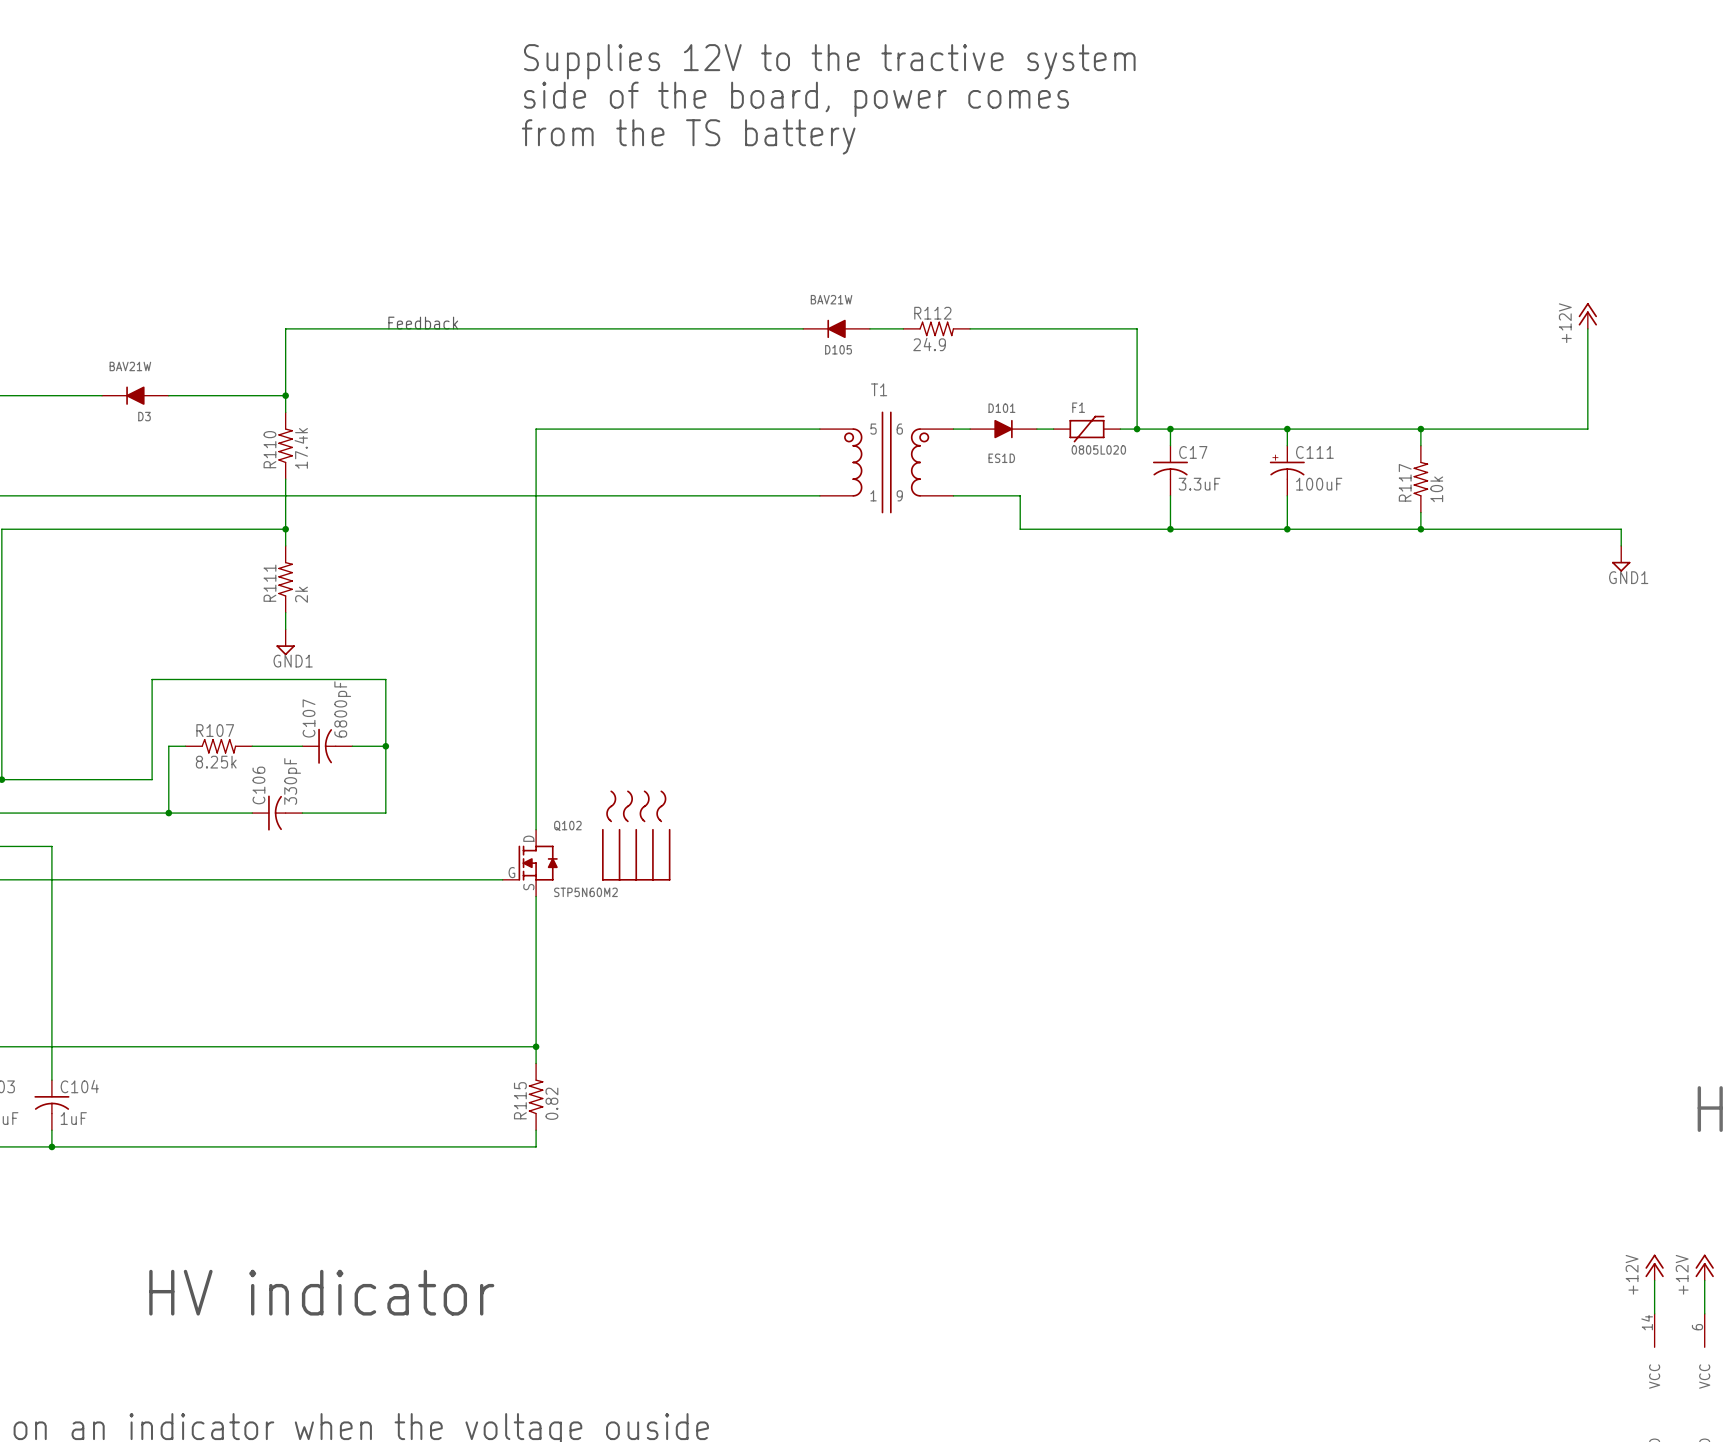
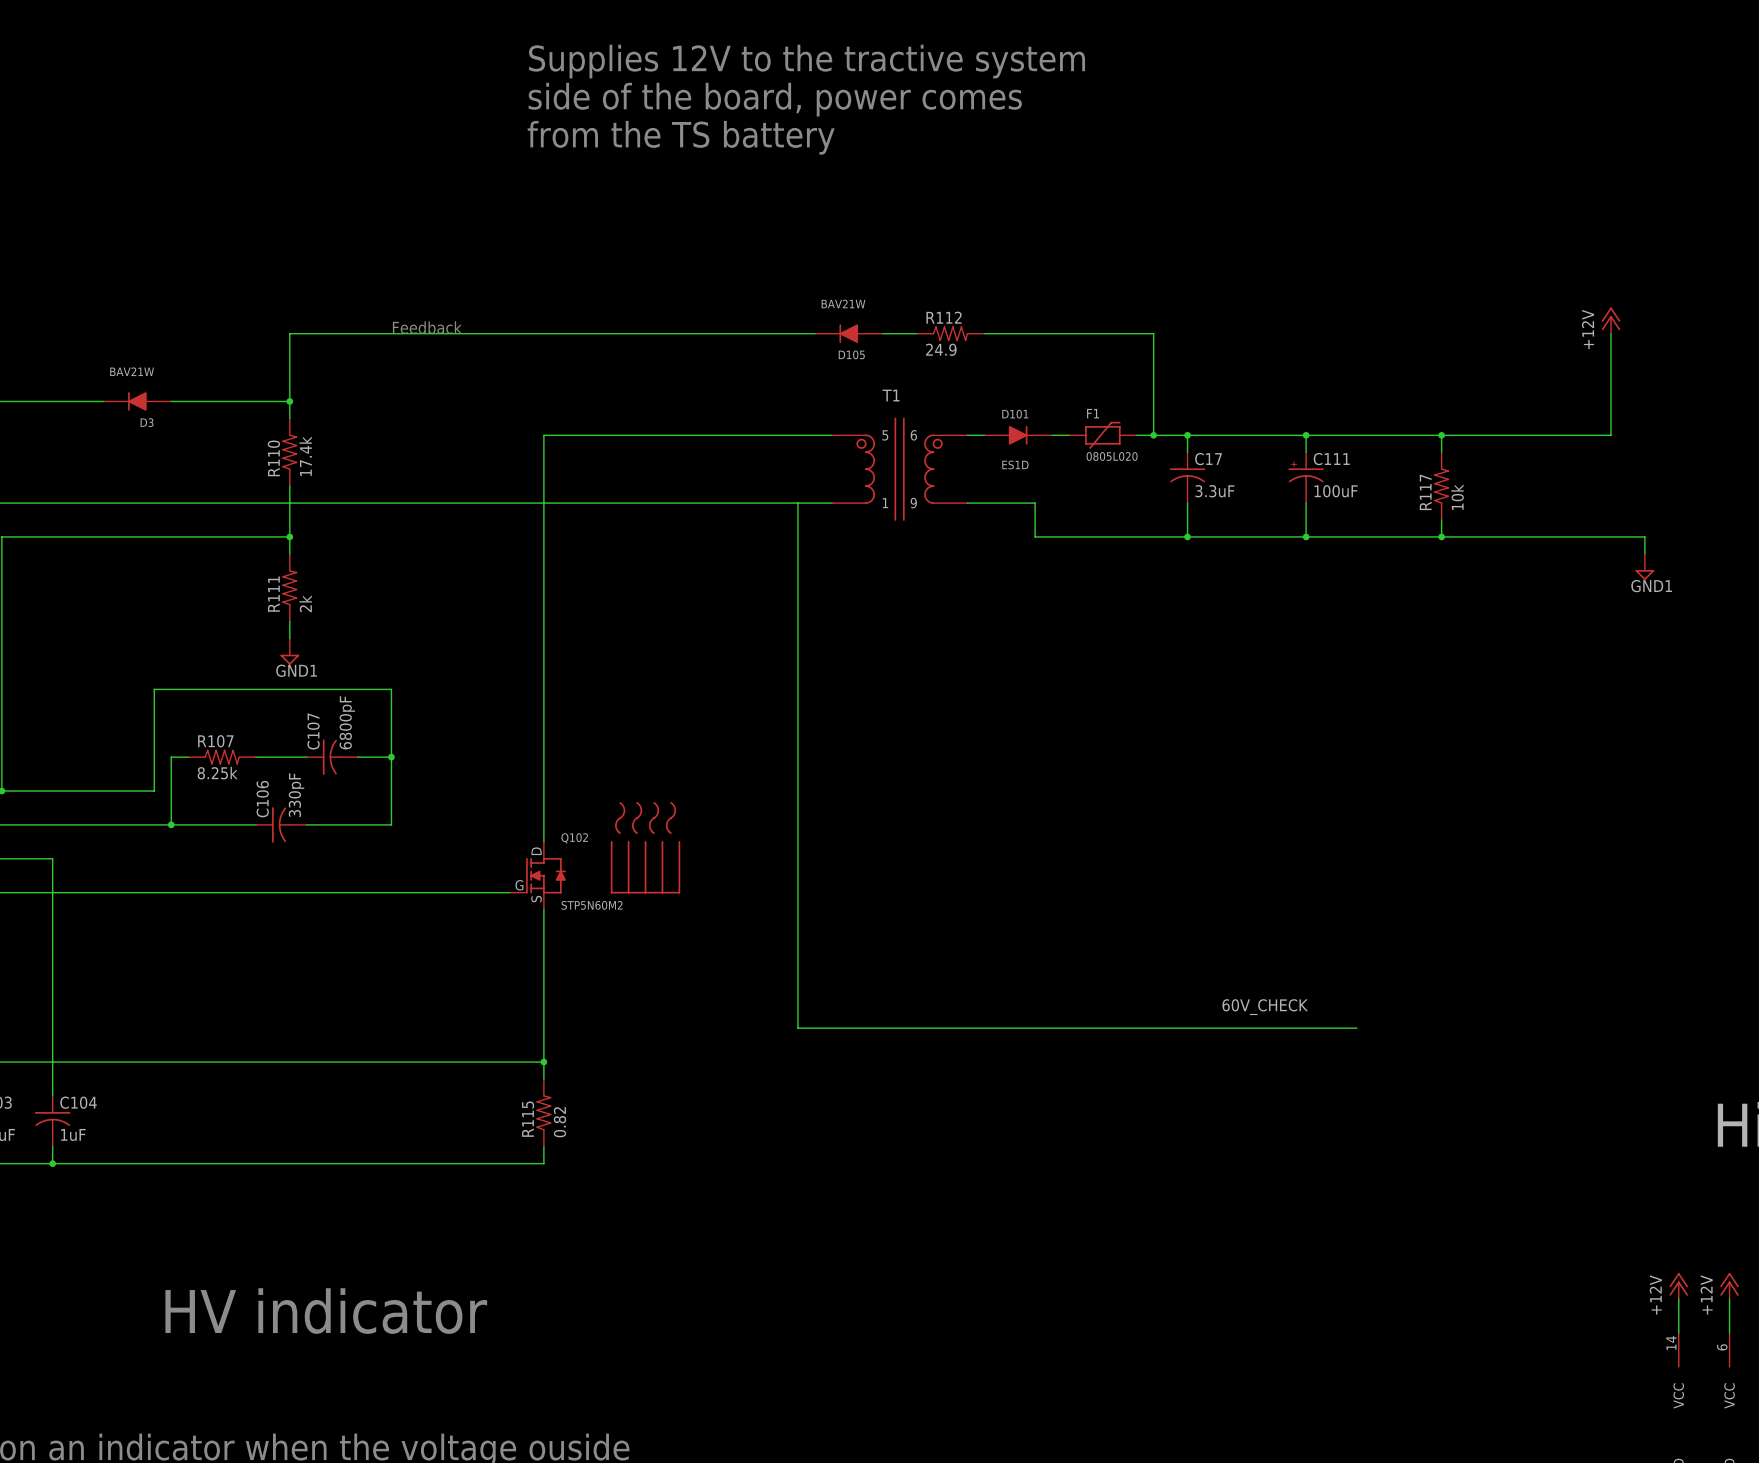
wire: none -> (797, 503) (797, 1028) (1356, 1028)
label: none -> 60V_CHECK (1265, 1007)

